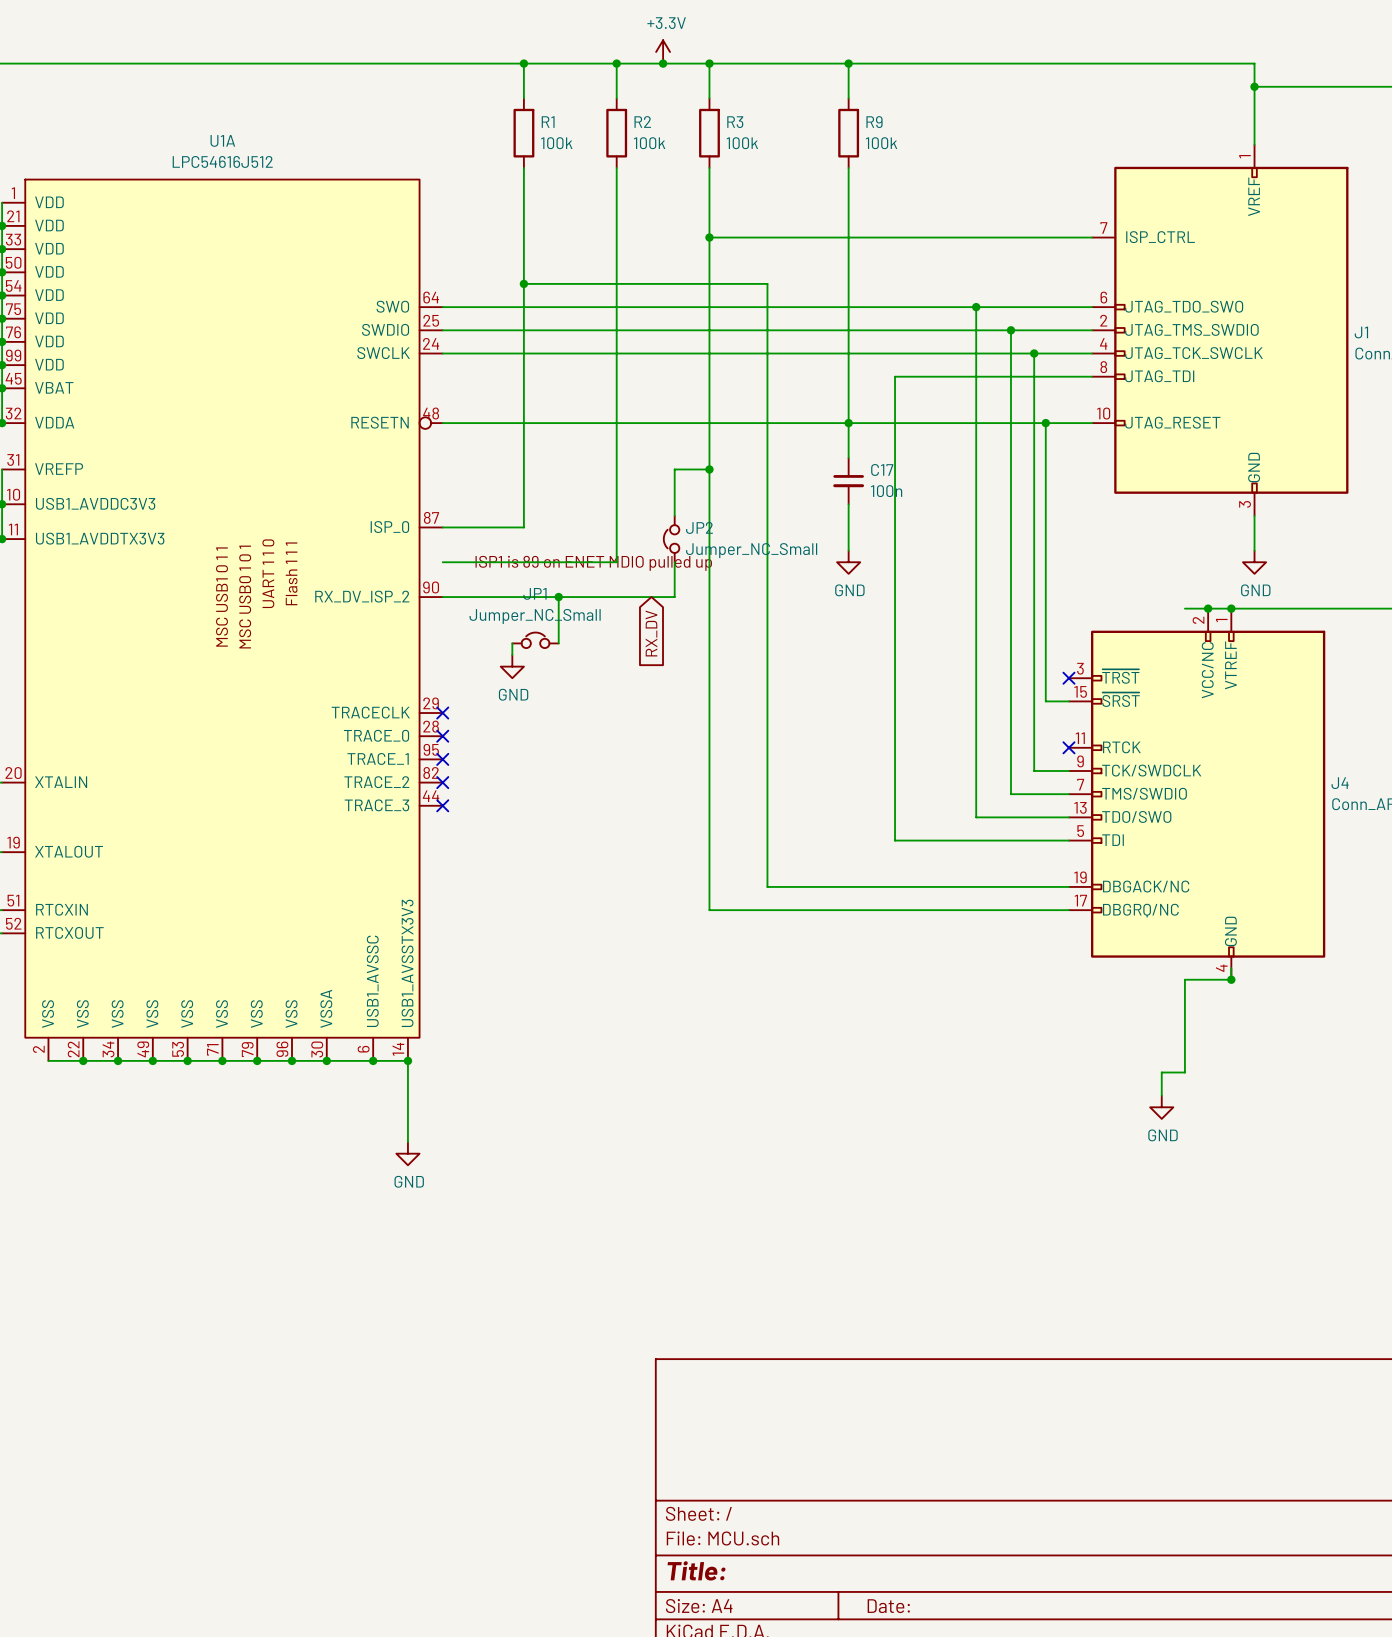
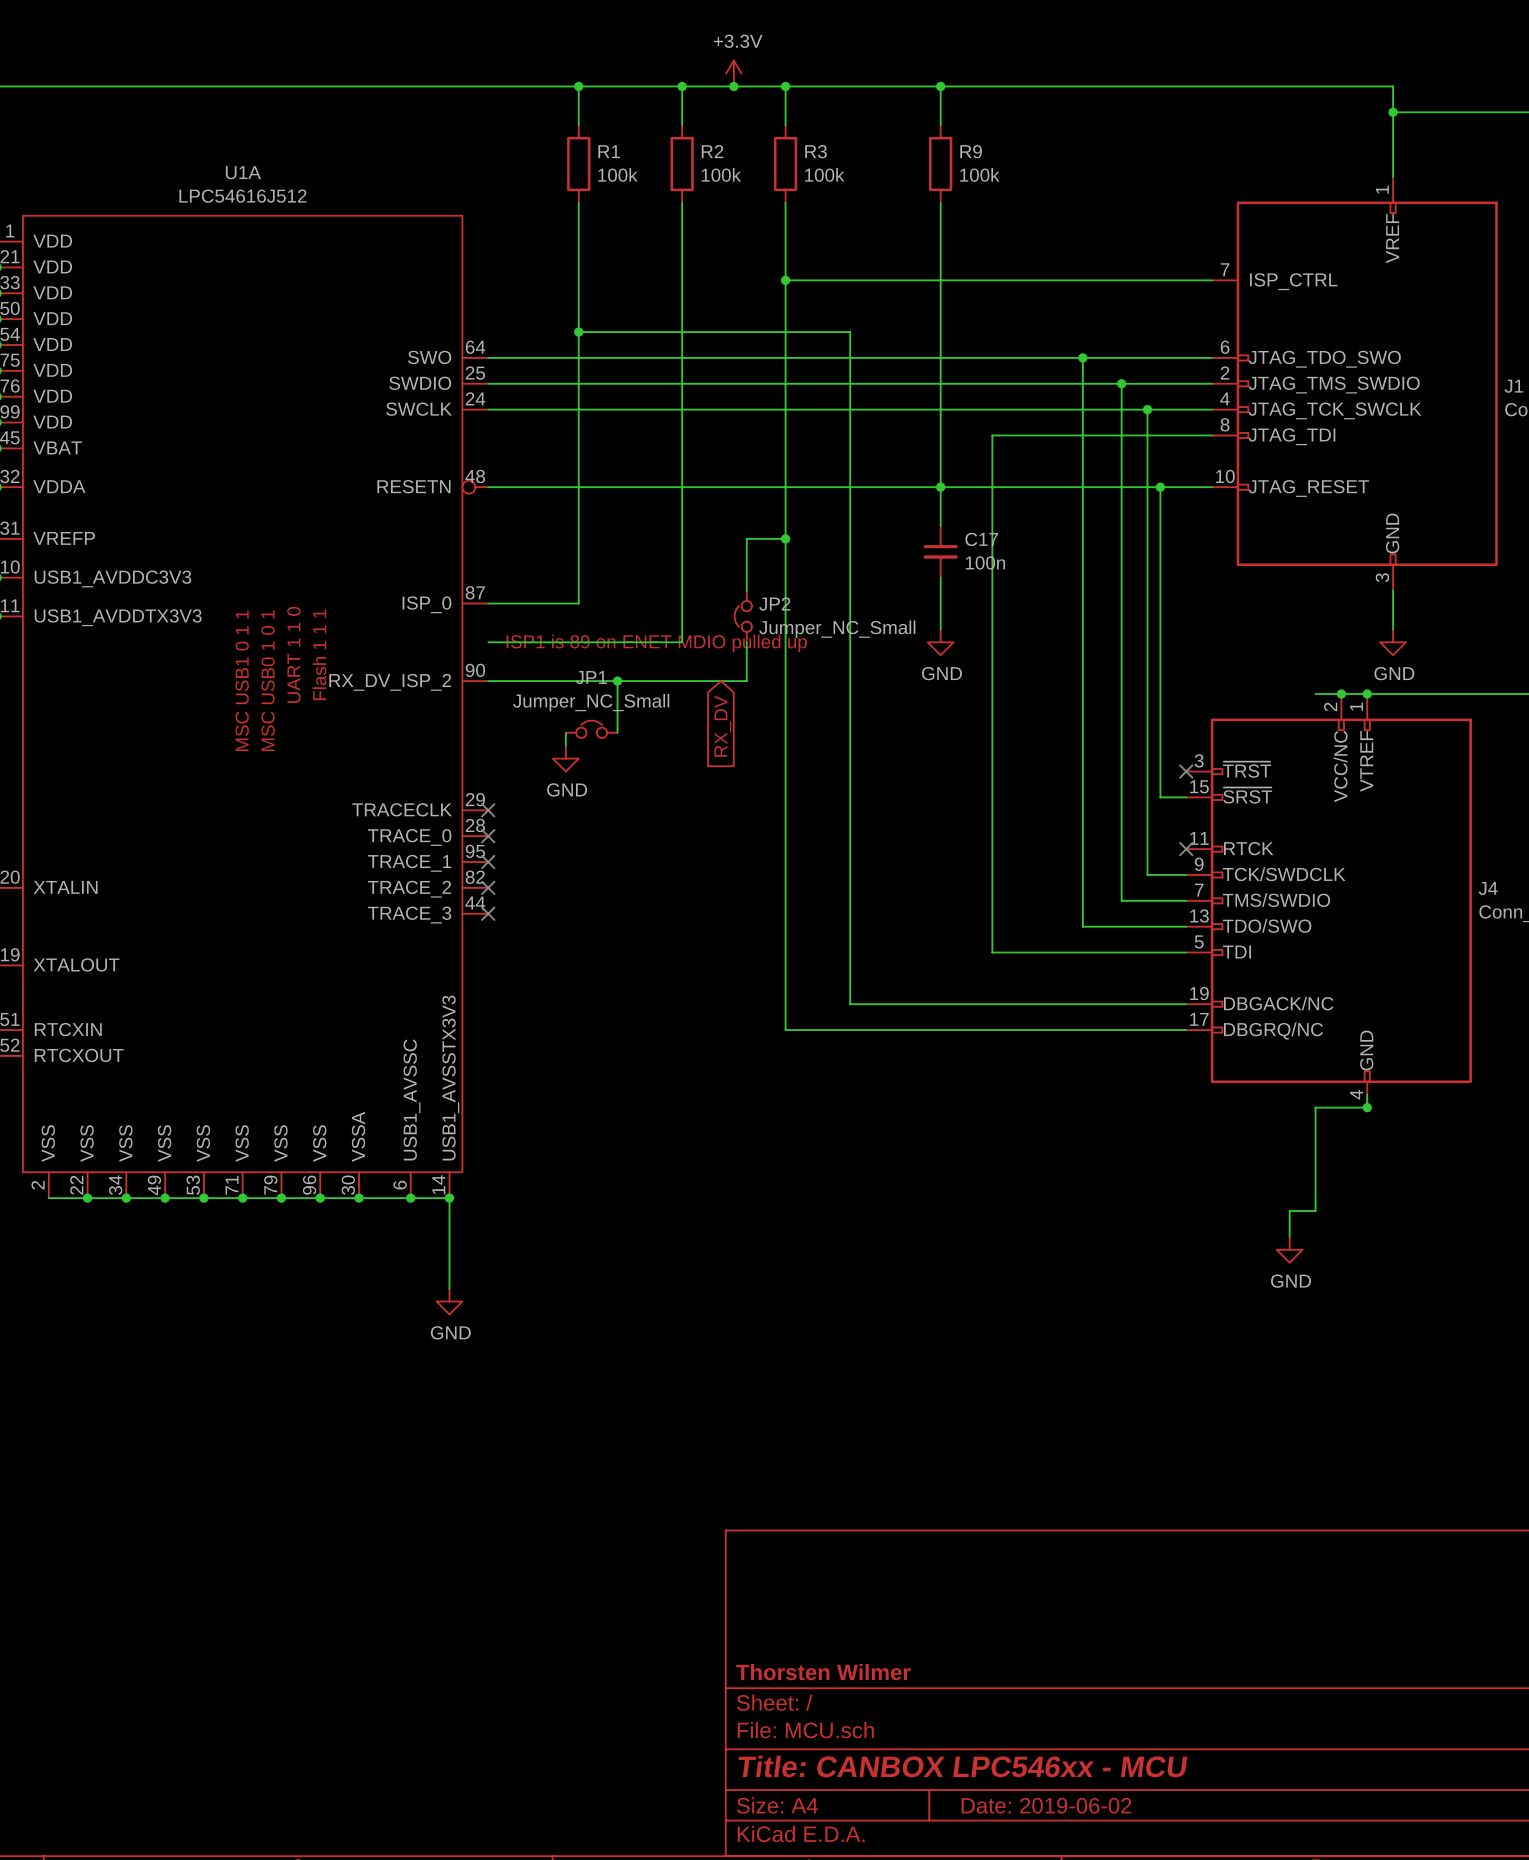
title block: none -> Thorsten Wilmer (823, 1672)
title block: Title: (696, 1570) -> Title: CANBOX LPC546xx - MCU (962, 1766)
title block: Date: (888, 1606) -> Date: 2019-06-02 (1046, 1805)

